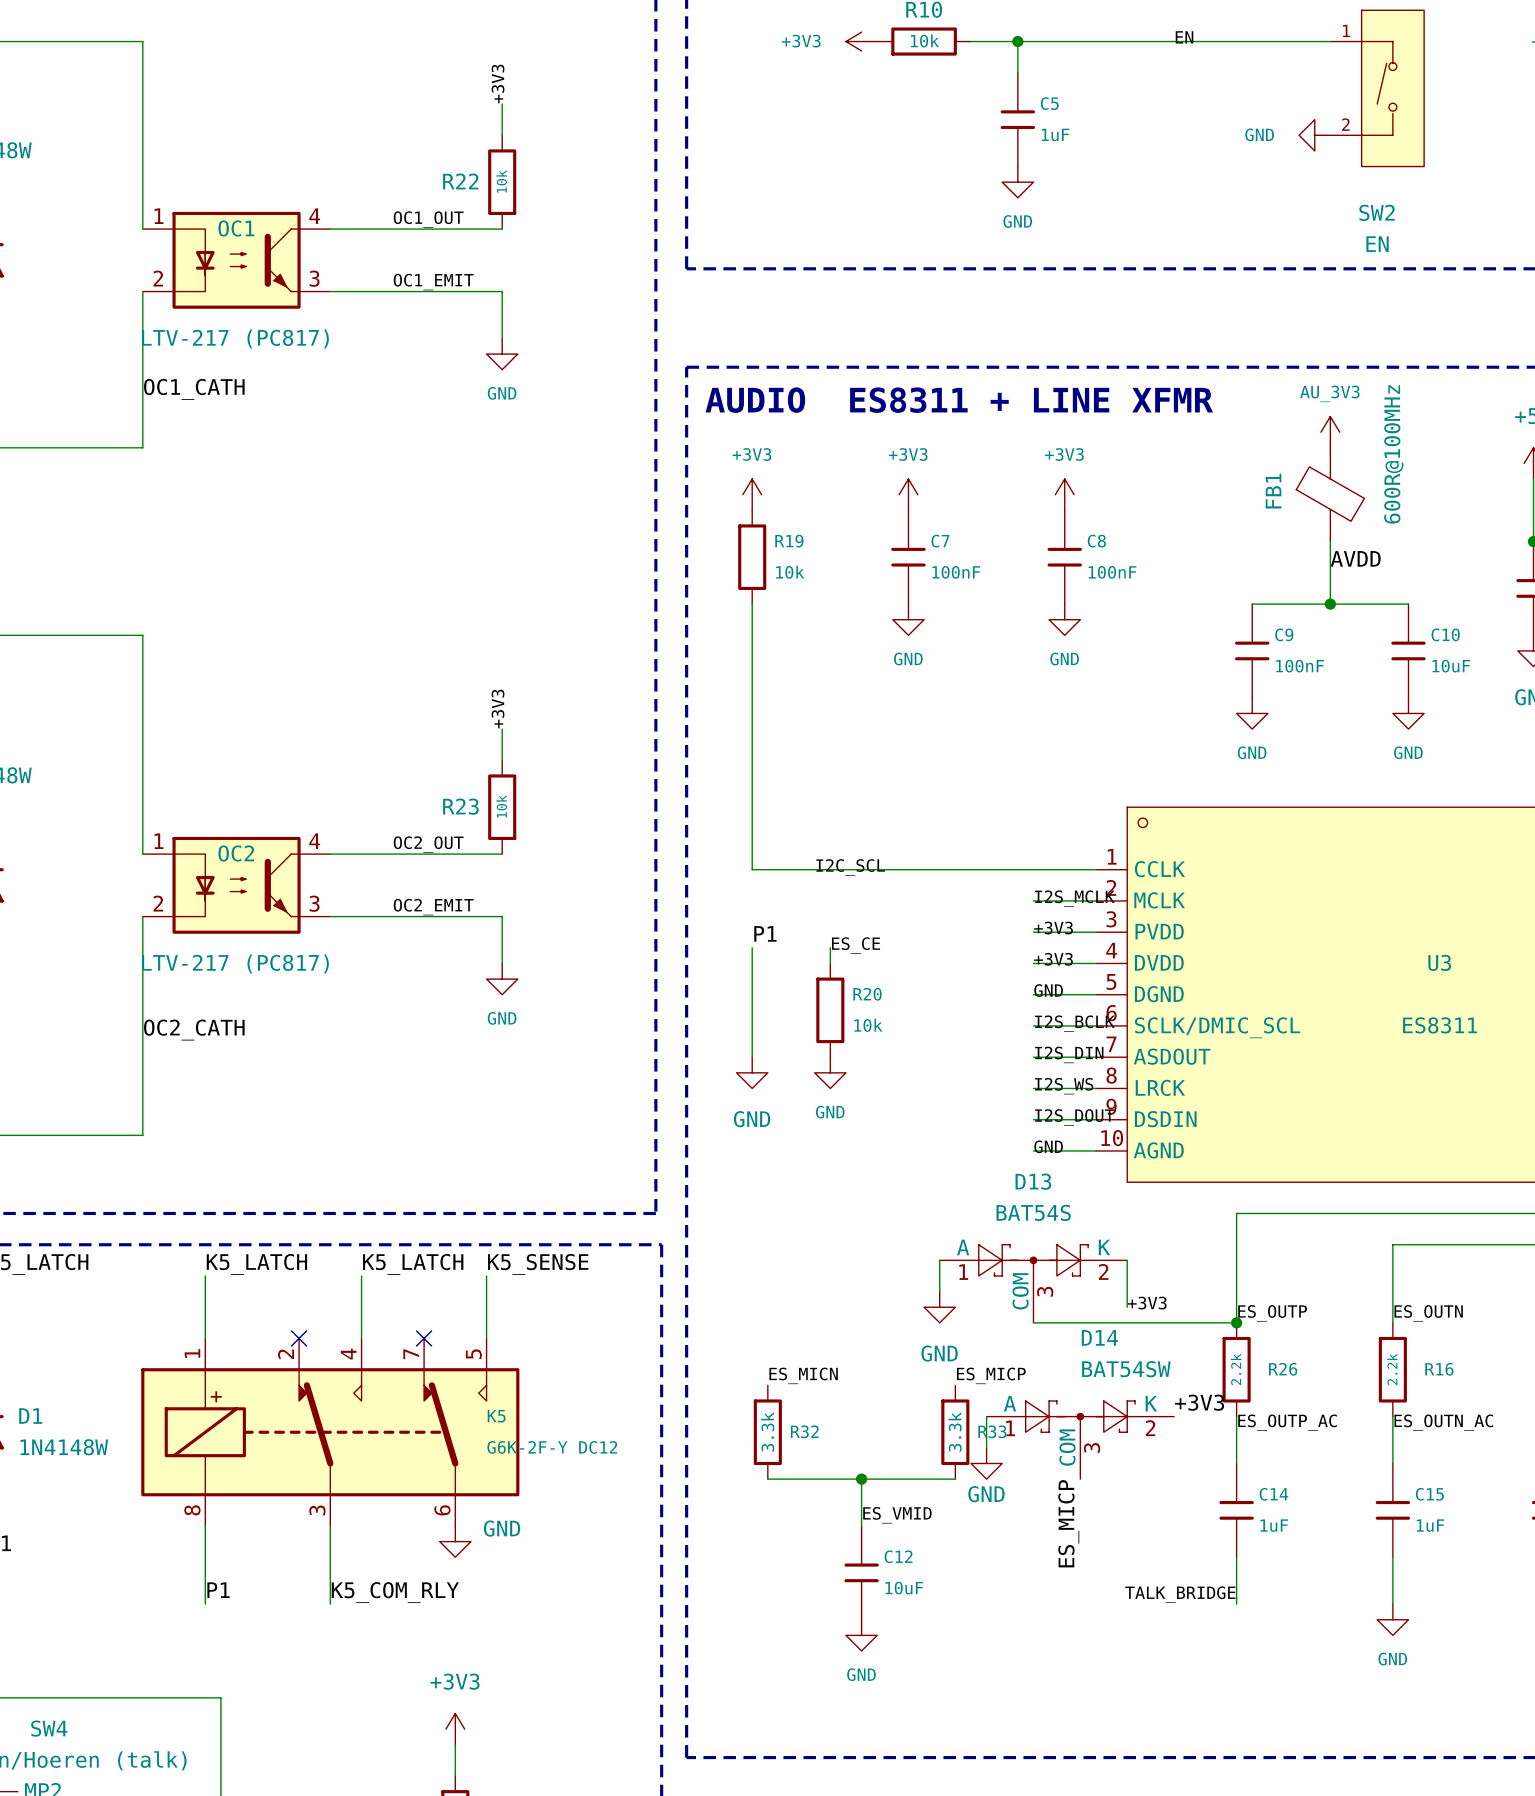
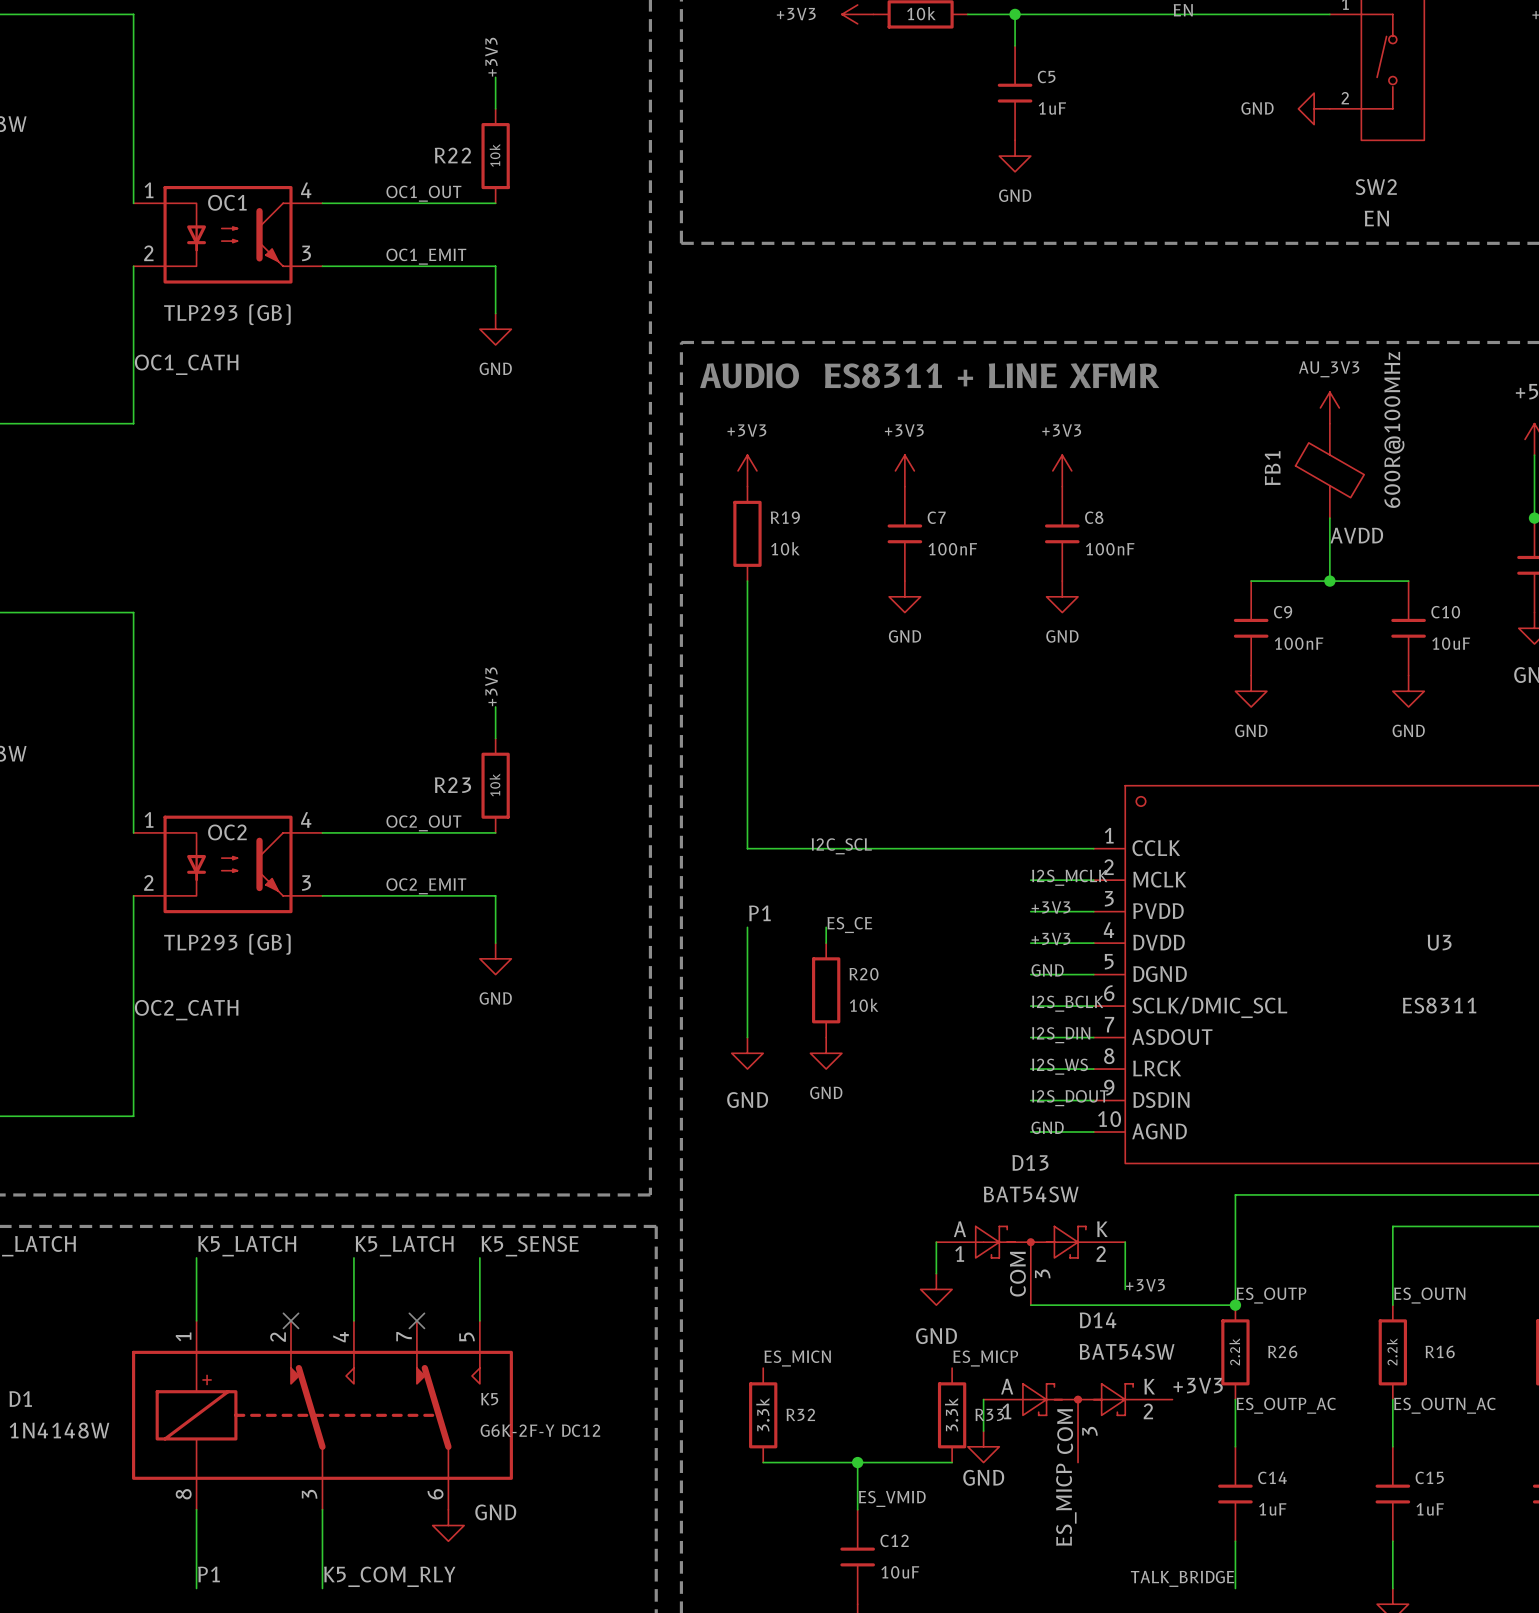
OC1 value: LTV-217 (PC817) (235, 338) -> TLP293 (GB) (227, 314)
OC2 value: LTV-217 (PC817) (235, 963) -> TLP293 (GB) (227, 944)
D13 value: BAT54S (1033, 1212) -> BAT54SW (1031, 1194)

